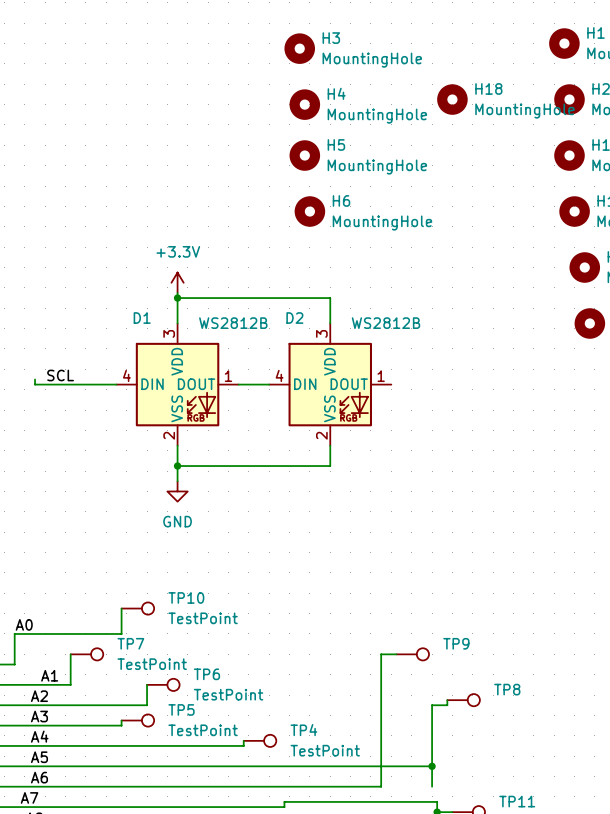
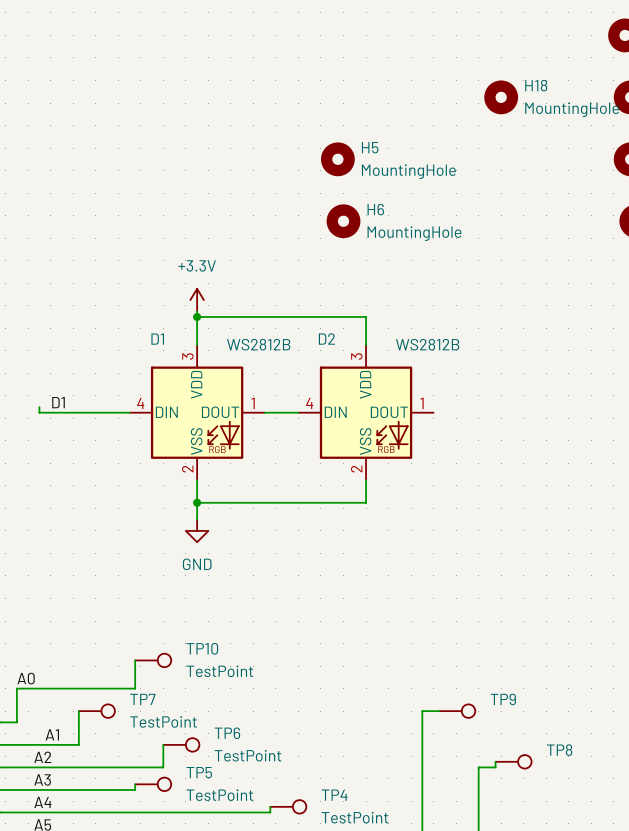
H3: MountingHole (299, 48) -> none
H4: MountingHole (304, 104) -> none
label: SCL (60, 375) -> D1 (58, 402)

